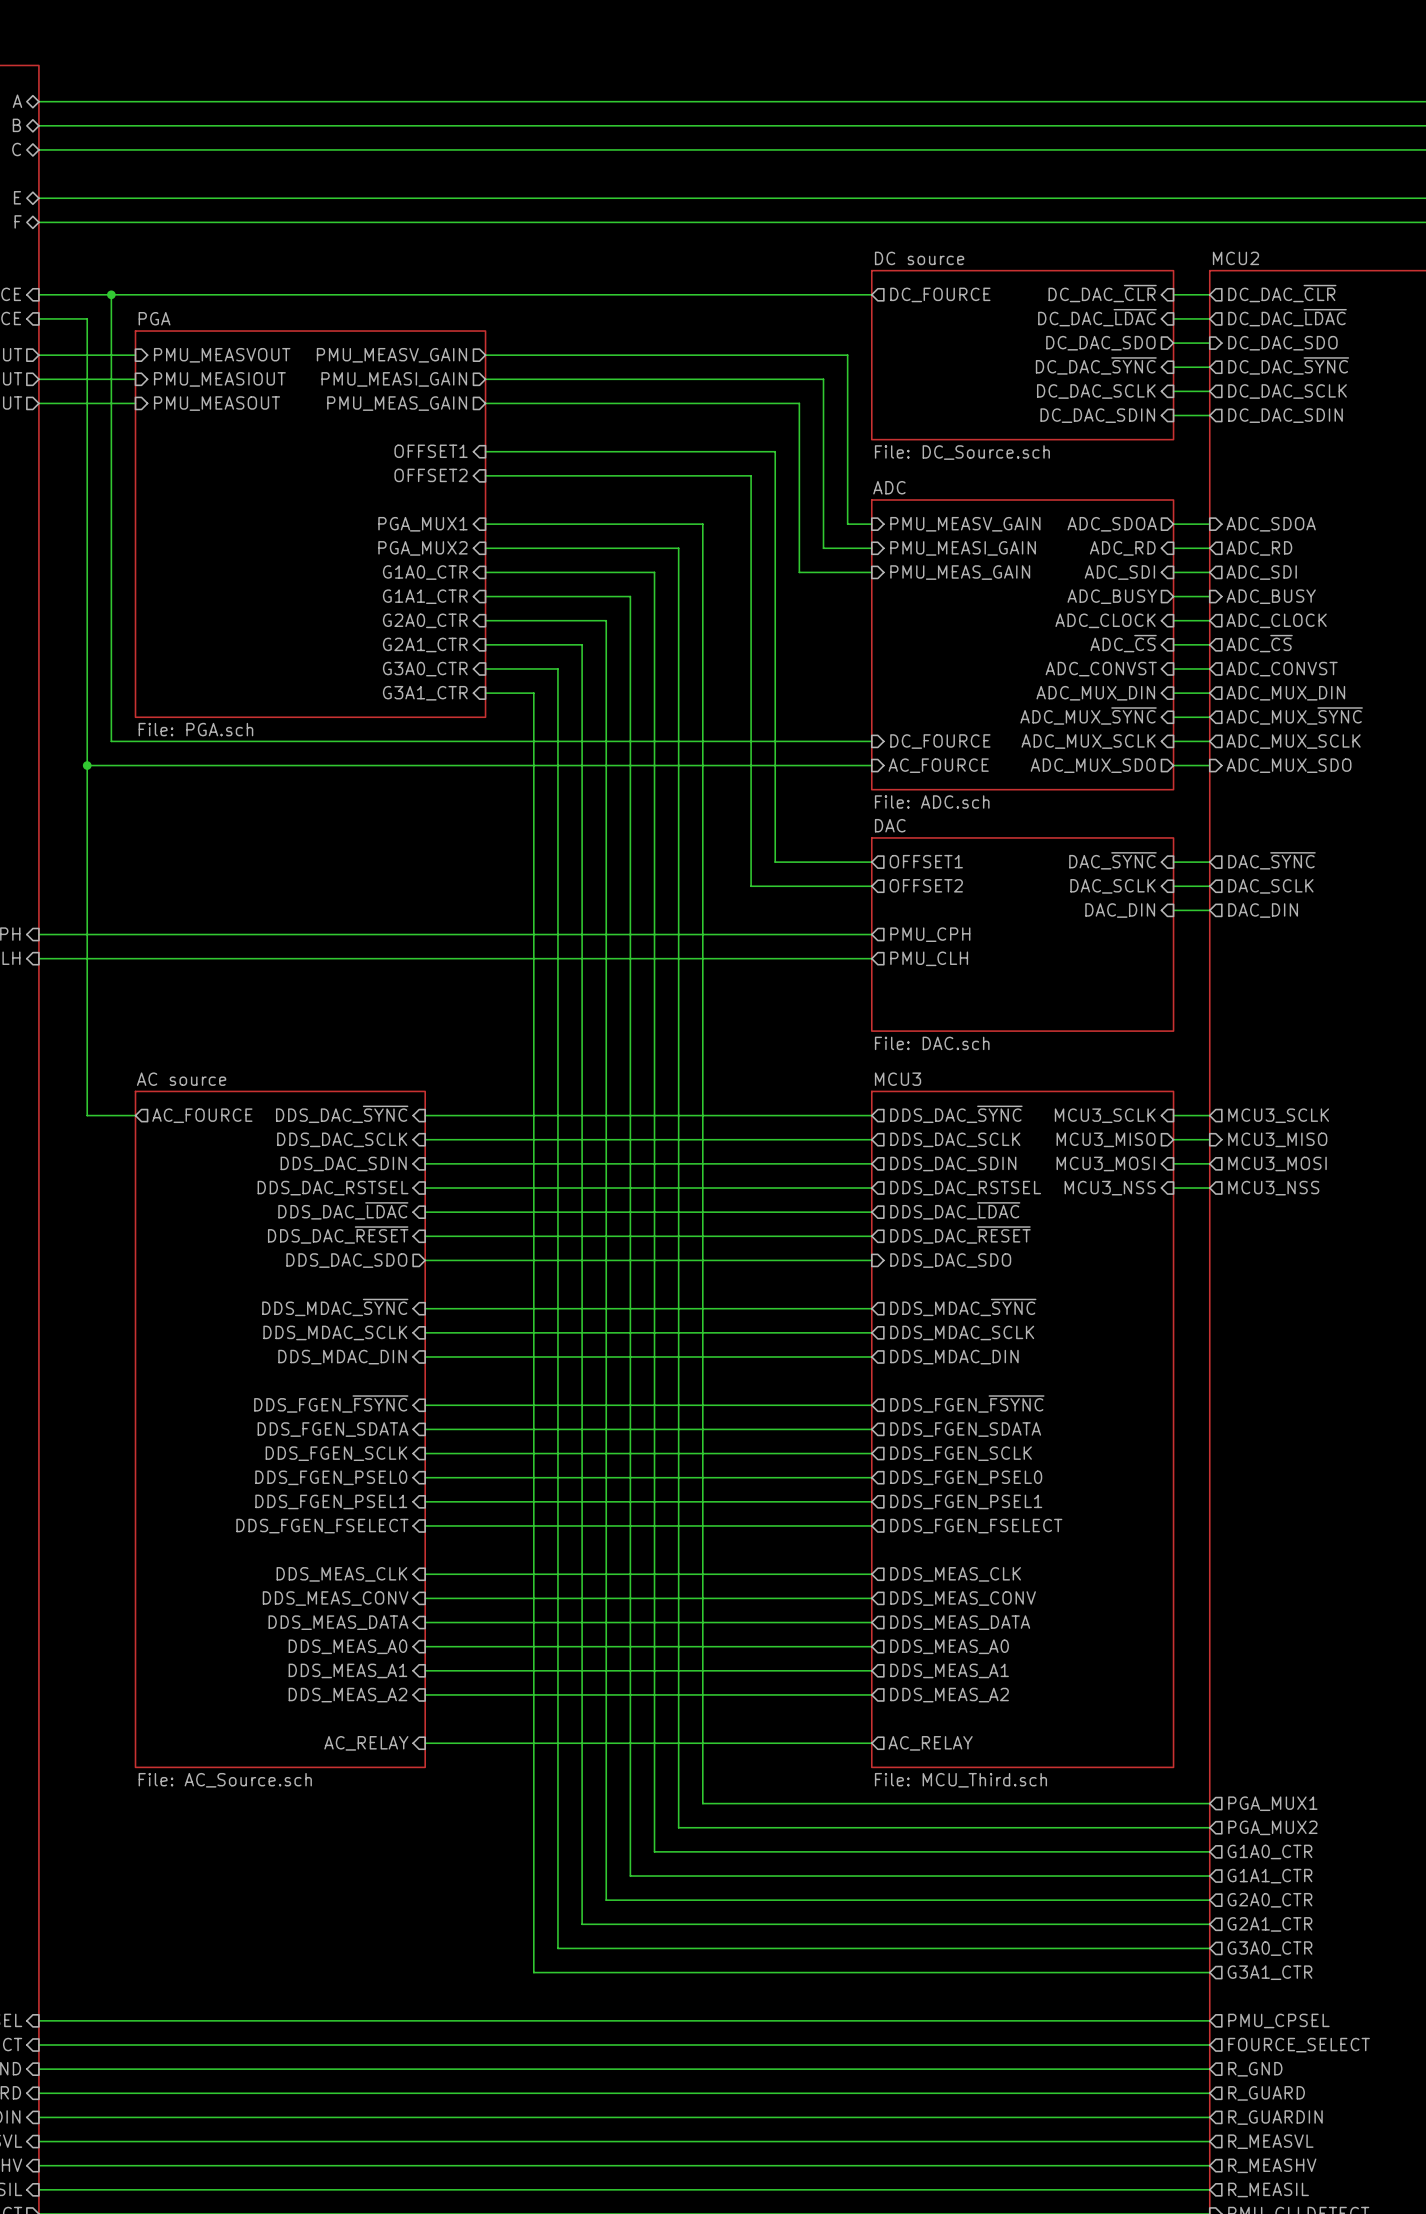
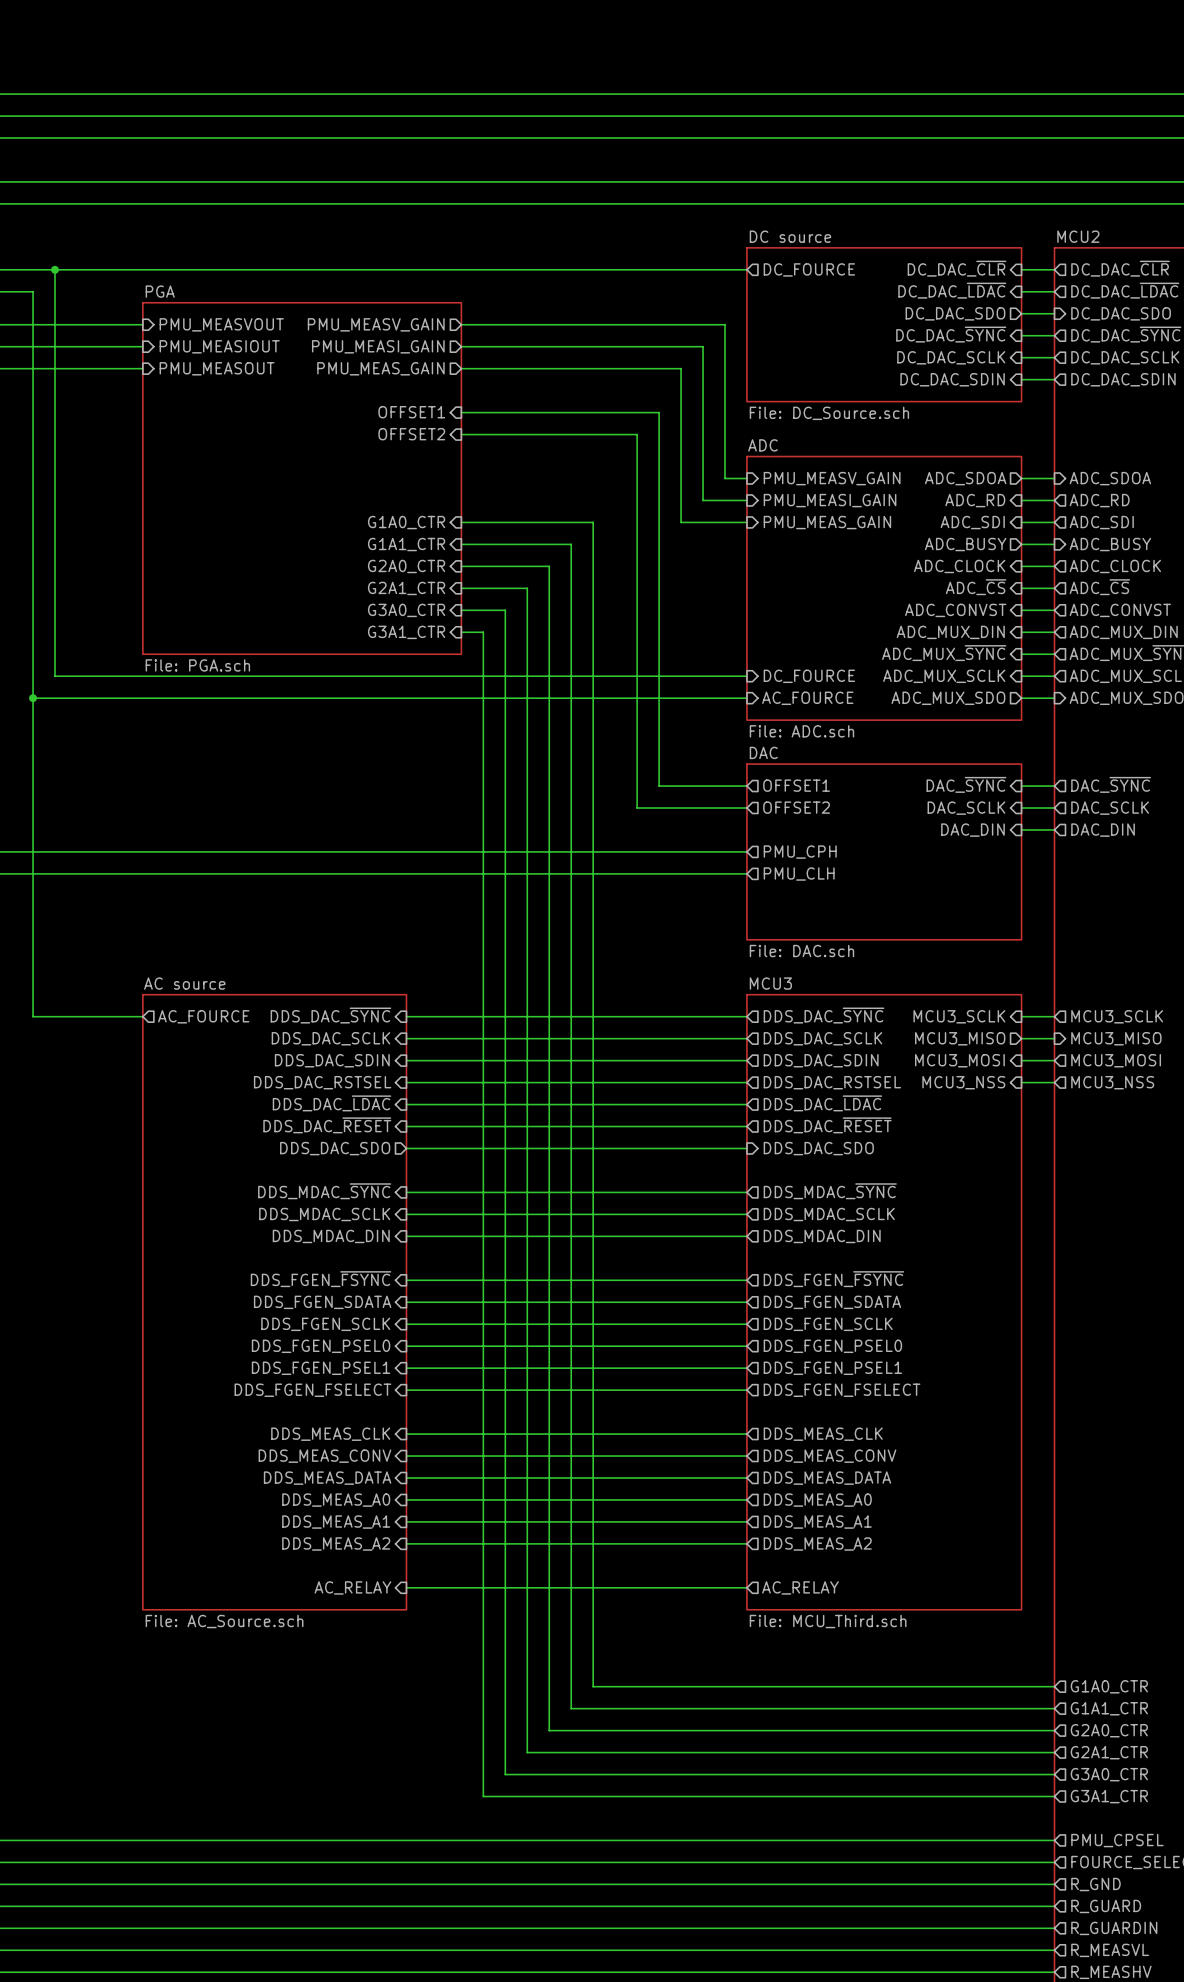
wire: none -> (76, 324) (142, 324)
sheet pin position: PMU_MEASVOUT (222, 355) -> PMU_MEASVOUT (221, 324)
sheet pin position: PMU_MEASV_GAIN (391, 355) -> PMU_MEASV_GAIN (376, 324)
wire: (485, 355) (557, 355) -> none
wire: none -> (76, 346) (142, 346)
sheet pin position: PMU_MEASIOUT (219, 379) -> PMU_MEASIOUT (219, 346)
sheet pin position: PMU_MEASI_GAIN (394, 379) -> PMU_MEASI_GAIN (378, 346)
wire: (485, 379) (557, 379) -> none
wire: none -> (76, 368) (142, 368)
sheet pin position: PMU_MEASOUT (217, 403) -> PMU_MEASOUT (217, 368)
sheet pin position: PMU_MEAS_GAIN (397, 403) -> PMU_MEAS_GAIN (380, 368)
wire: (485, 403) (557, 403) -> none
sheet pin position: OFFSET1 (431, 451) -> OFFSET1 (411, 412)
wire: (485, 451) (557, 451) -> none
sheet pin position: OFFSET2 (431, 475) -> OFFSET2 (411, 434)
wire: (485, 475) (557, 475) -> none
sheet PGA position: (310, 524) -> (302, 478)
sheet pin: PGA_MUX1 (422, 524) -> none
wire: (485, 524) (702, 524) (702, 572) -> none
sheet pin: PGA_MUX2 (422, 548) -> none
wire: (485, 548) (678, 548) (678, 596) -> (527, 544) (571, 544)
sheet pin position: G1A0_CTR (425, 572) -> G1A0_CTR (406, 522)
wire: (485, 572) (557, 572) -> none
wire: (654, 572) (654, 620) -> (549, 522) (593, 522)
sheet pin position: G1A1_CTR (425, 596) -> G1A1_CTR (406, 544)
wire: (485, 596) (557, 596) -> none
wire: (630, 596) (630, 644) -> (483, 588) (527, 588)
sheet pin position: G2A0_CTR (425, 620) -> G2A0_CTR (406, 566)
wire: (485, 620) (557, 620) -> none
wire: (606, 620) (606, 668) -> (461, 610) (505, 610)
wire: none -> (505, 566) (549, 566)
sheet pin position: G2A1_CTR (425, 644) -> G2A1_CTR (406, 588)
wire: (485, 644) (557, 644) -> none
wire: (582, 644) (582, 693) -> (461, 632) (483, 632)
wire: (485, 668) (557, 668) (557, 1948) (606, 1948) -> (505, 1730) (505, 1774)
sheet pin position: G3A0_CTR (425, 669) -> G3A0_CTR (406, 610)
sheet pin position: G3A1_CTR (425, 693) -> G3A1_CTR (406, 632)
wire: (485, 693) (533, 693) (533, 1972) (582, 1972) -> (483, 1752) (483, 1796)
sheet pin position: DDS_DAC_~{SYNC} (342, 1114) -> DDS_DAC_~{SYNC} (330, 1015)
wire: none -> (76, 1016) (142, 1016)
sheet pin position: AC_FOURCE (202, 1115) -> AC_FOURCE (203, 1016)
wire: (425, 1115) (497, 1115) -> none
sheet pin position: DDS_DAC_SCLK (342, 1139) -> DDS_DAC_SCLK (330, 1038)
wire: (425, 1139) (497, 1139) -> none
sheet pin position: DDS_DAC_SDIN (343, 1163) -> DDS_DAC_SDIN (332, 1060)
wire: (425, 1163) (497, 1163) -> none
sheet pin position: DDS_DAC_RSTSEL (333, 1188) -> DDS_DAC_RSTSEL (322, 1082)
wire: (425, 1188) (497, 1188) -> none
sheet pin position: DDS_DAC_~{LDAC} (343, 1210) -> DDS_DAC_~{LDAC} (332, 1103)
wire: (425, 1212) (497, 1212) -> none
sheet pin position: DDS_DAC_~{RESET} (338, 1235) -> DDS_DAC_~{RESET} (327, 1125)
wire: (425, 1236) (497, 1236) -> none
sheet pin position: DDS_DAC_SDO (346, 1260) -> DDS_DAC_SDO (335, 1148)
wire: (425, 1260) (497, 1260) -> none
sheet pin position: DDS_MDAC_~{SYNC} (335, 1307) -> DDS_MDAC_~{SYNC} (324, 1191)
wire: (425, 1308) (497, 1308) -> none
sheet pin position: DDS_MDAC_SCLK (335, 1332) -> DDS_MDAC_SCLK (324, 1214)
wire: (425, 1332) (497, 1332) -> none
wire: (425, 1356) (497, 1356) -> none
sheet pin position: DDS_MDAC_DIN (342, 1357) -> DDS_MDAC_DIN (331, 1236)
sheet pin position: DDS_FGEN_~{FSYNC} (331, 1404) -> DDS_FGEN_~{FSYNC} (321, 1279)
wire: (425, 1405) (497, 1405) -> none
sheet AC source position: (280, 1429) -> (274, 1302)
sheet pin position: DDS_FGEN_SDATA (333, 1429) -> DDS_FGEN_SDATA (322, 1302)
wire: (425, 1429) (497, 1429) -> none
sheet pin position: DDS_FGEN_SCLK (336, 1453) -> DDS_FGEN_SCLK (325, 1324)
wire: (425, 1453) (497, 1453) -> none
sheet pin position: DDS_FGEN_PSEL0 (331, 1477) -> DDS_FGEN_PSEL0 (321, 1346)
wire: (425, 1477) (497, 1477) -> none
sheet pin position: DDS_FGEN_PSEL1 (331, 1501) -> DDS_FGEN_PSEL1 (321, 1368)
wire: (425, 1501) (497, 1501) -> none
wire: (425, 1525) (497, 1525) -> none
sheet pin position: DDS_FGEN_FSELECT (322, 1526) -> DDS_FGEN_FSELECT (312, 1390)
sheet pin position: DDS_MEAS_CLK (341, 1574) -> DDS_MEAS_CLK (330, 1434)
wire: (425, 1574) (497, 1574) -> none
sheet pin position: DDS_MEAS_CONV (335, 1598) -> DDS_MEAS_CONV (324, 1456)
wire: (425, 1598) (497, 1598) -> none
sheet pin position: DDS_MEAS_DATA (338, 1622) -> DDS_MEAS_DATA (327, 1478)
wire: (425, 1622) (497, 1622) -> none
sheet pin position: DDS_MEAS_A0 (347, 1646) -> DDS_MEAS_A0 (336, 1500)
wire: (425, 1646) (497, 1646) -> none
sheet pin position: DDS_MEAS_A1 (347, 1670) -> DDS_MEAS_A1 (336, 1522)
wire: (425, 1670) (497, 1670) -> none
wire: (425, 1694) (497, 1694) -> none
sheet pin position: DDS_MEAS_A2 (347, 1695) -> DDS_MEAS_A2 (336, 1544)
sheet pin position: AC_RELAY (366, 1743) -> AC_RELAY (352, 1587)
wire: (425, 1743) (497, 1743) -> none
wire: (702, 1803) (1209, 1803) -> none
sheet pin: PGA_MUX1 (1272, 1803) -> none
wire: (678, 1827) (1209, 1827) -> none
sheet pin: PGA_MUX2 (1272, 1827) -> none
wire: (654, 1851) (702, 1851) -> (593, 1642) (593, 1686)
wire: (630, 1876) (678, 1876) -> (571, 1664) (571, 1708)
wire: (606, 1900) (654, 1900) -> (549, 1686) (549, 1730)
wire: (582, 1924) (630, 1924) -> (527, 1708) (527, 1752)

